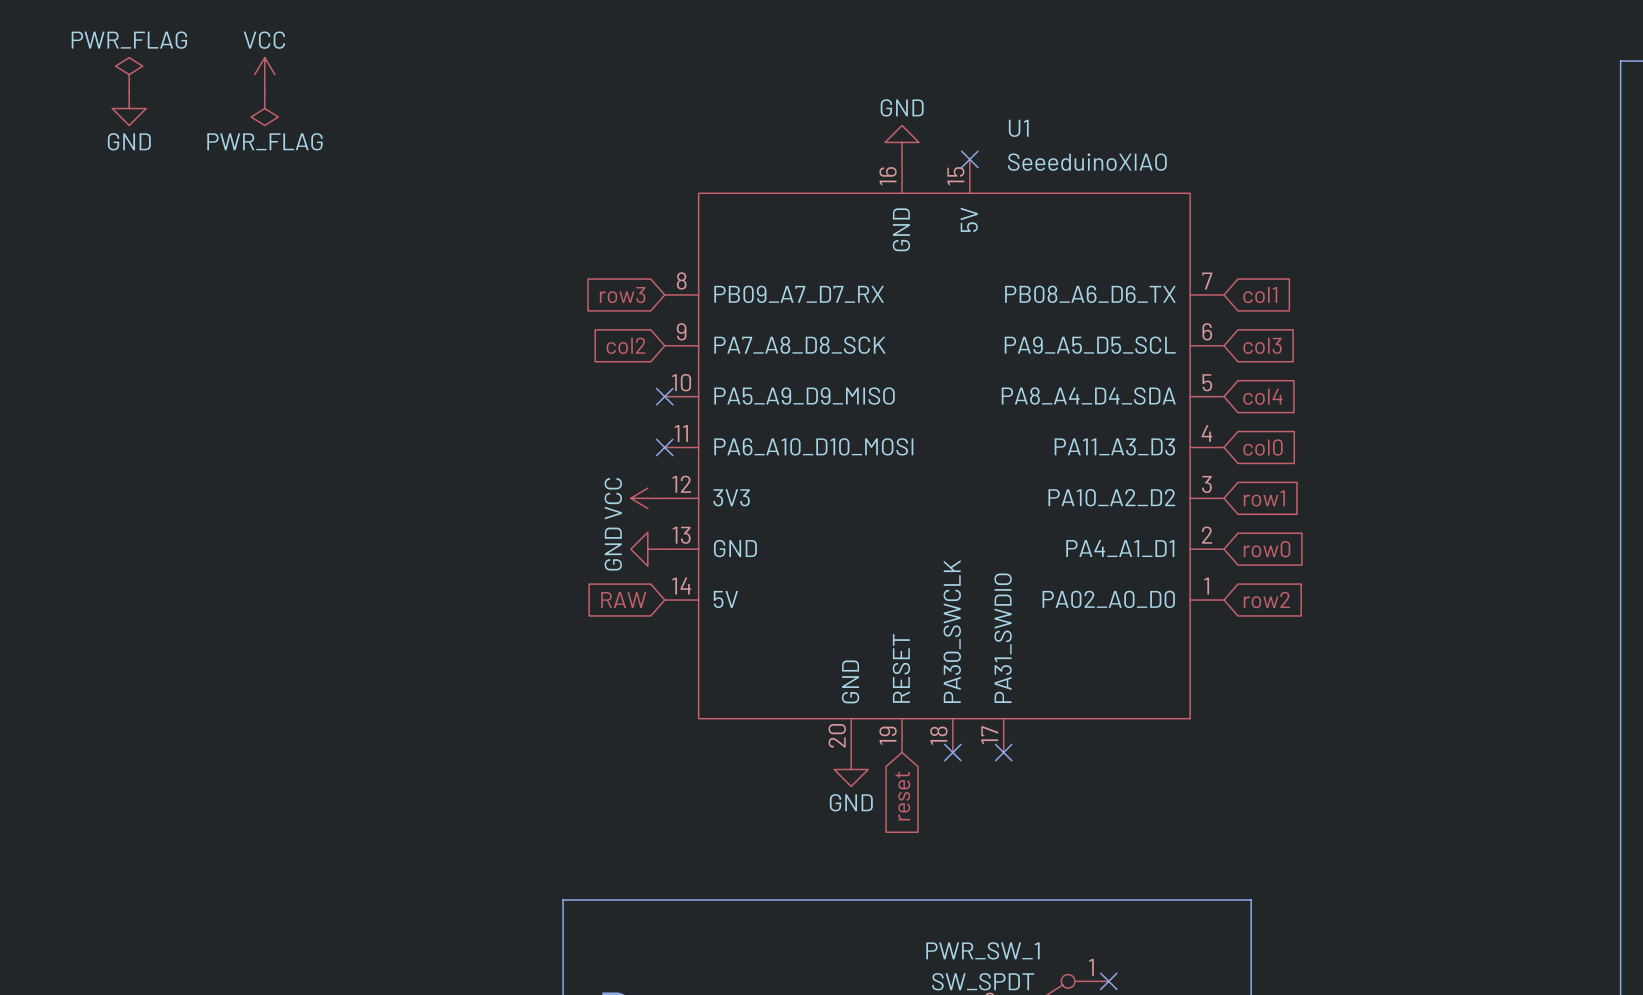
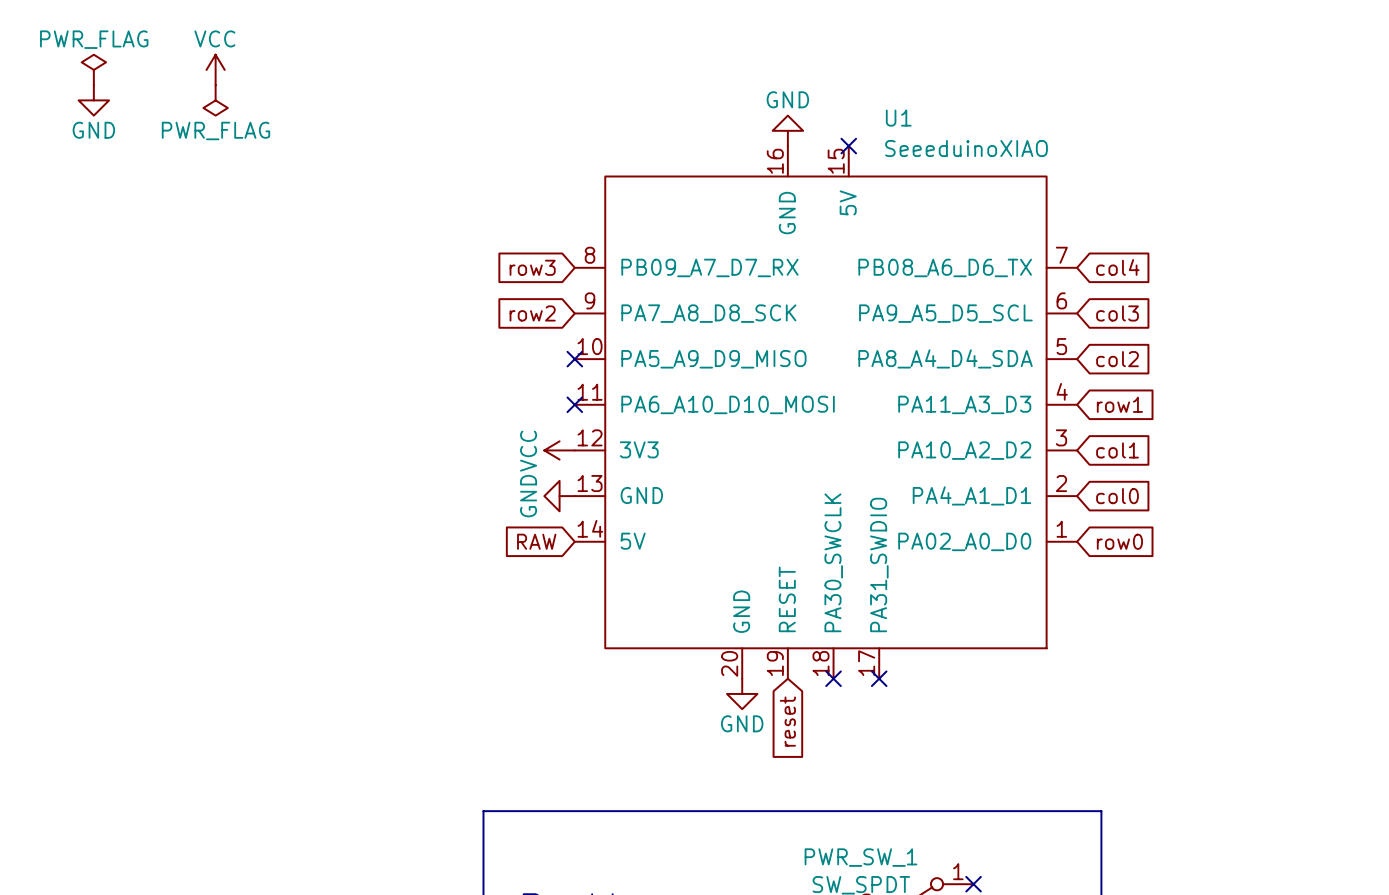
global label: col1 (1260, 295) -> col4 (1117, 267)
global label: col2 (626, 345) -> row2 (532, 313)
global label: col4 (1263, 396) -> col2 (1117, 359)
global label: col0 (1263, 447) -> row1 (1119, 404)
global label: row1 (1264, 498) -> col1 (1117, 450)
global label: row0 (1267, 549) -> col0 (1117, 496)
global label: row2 (1266, 600) -> row0 (1119, 541)

